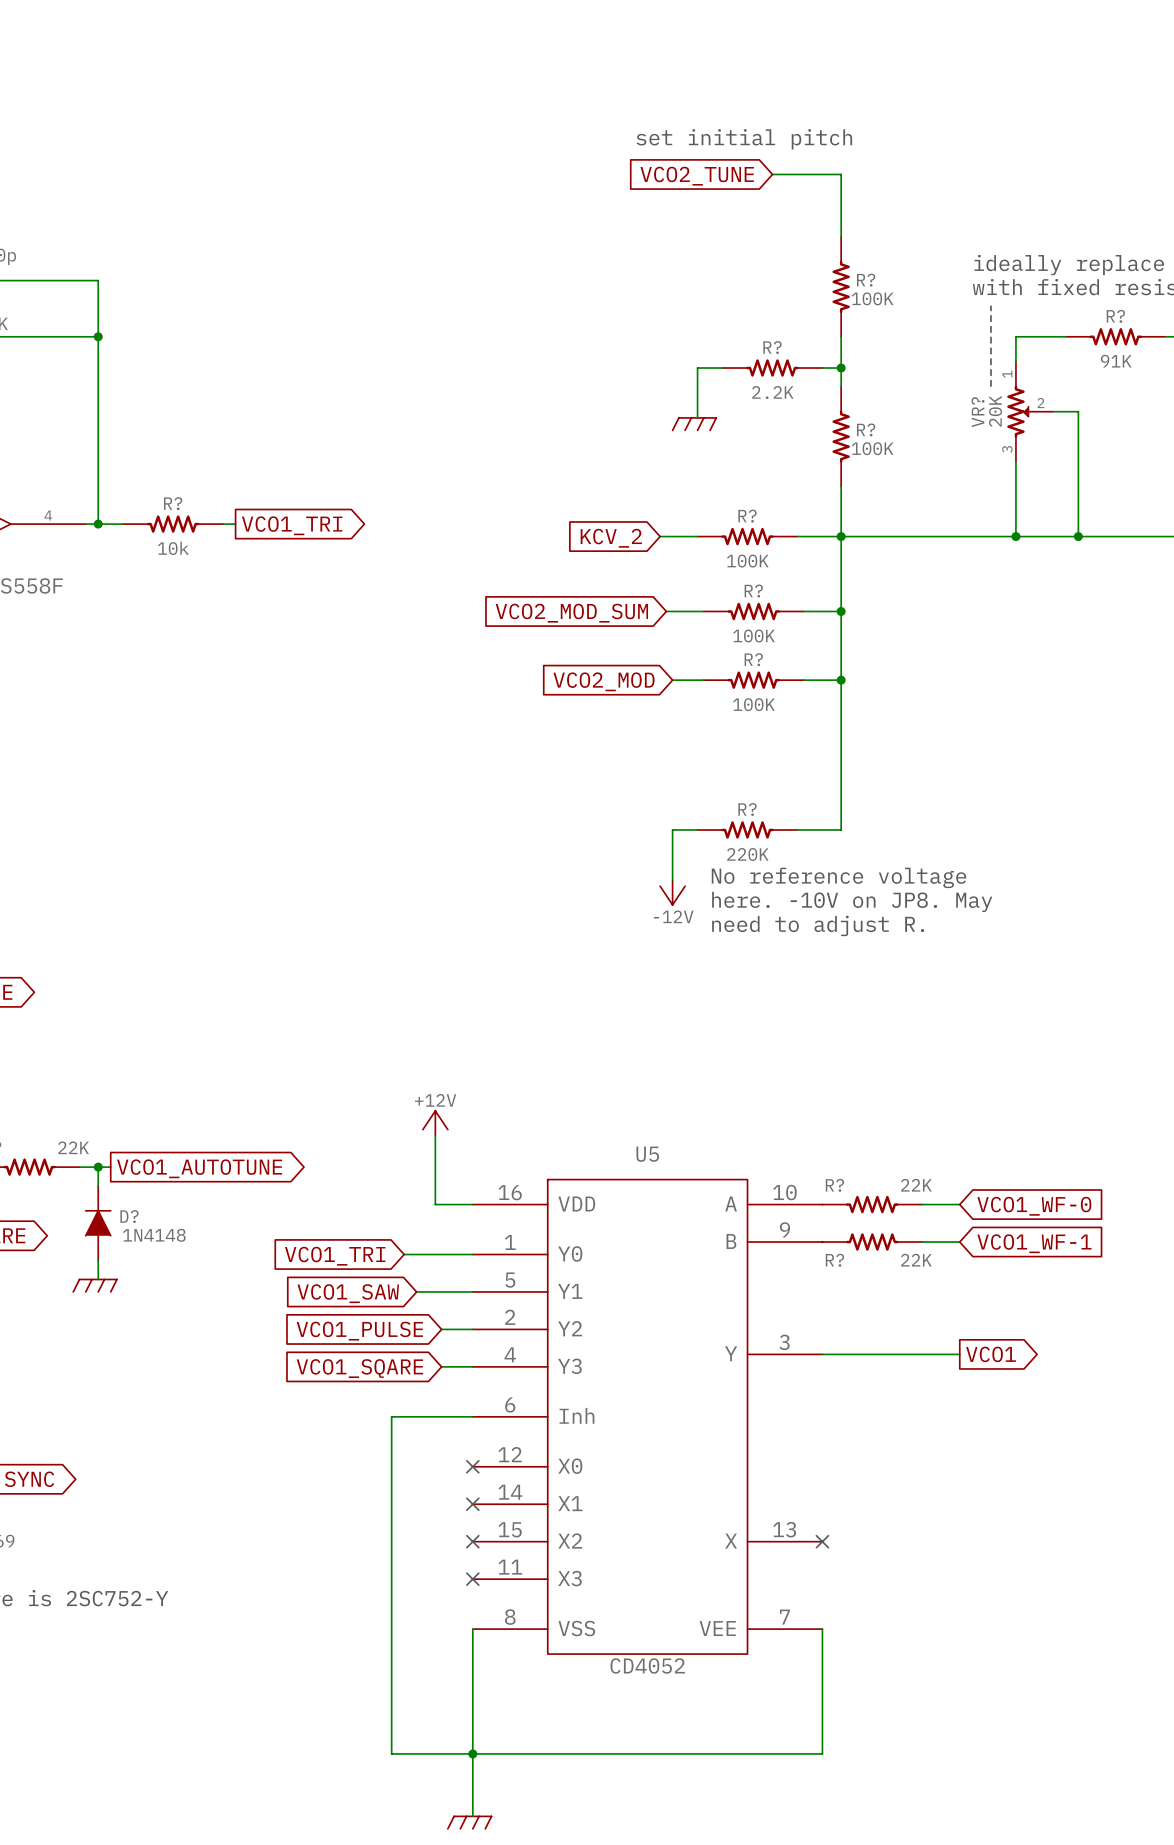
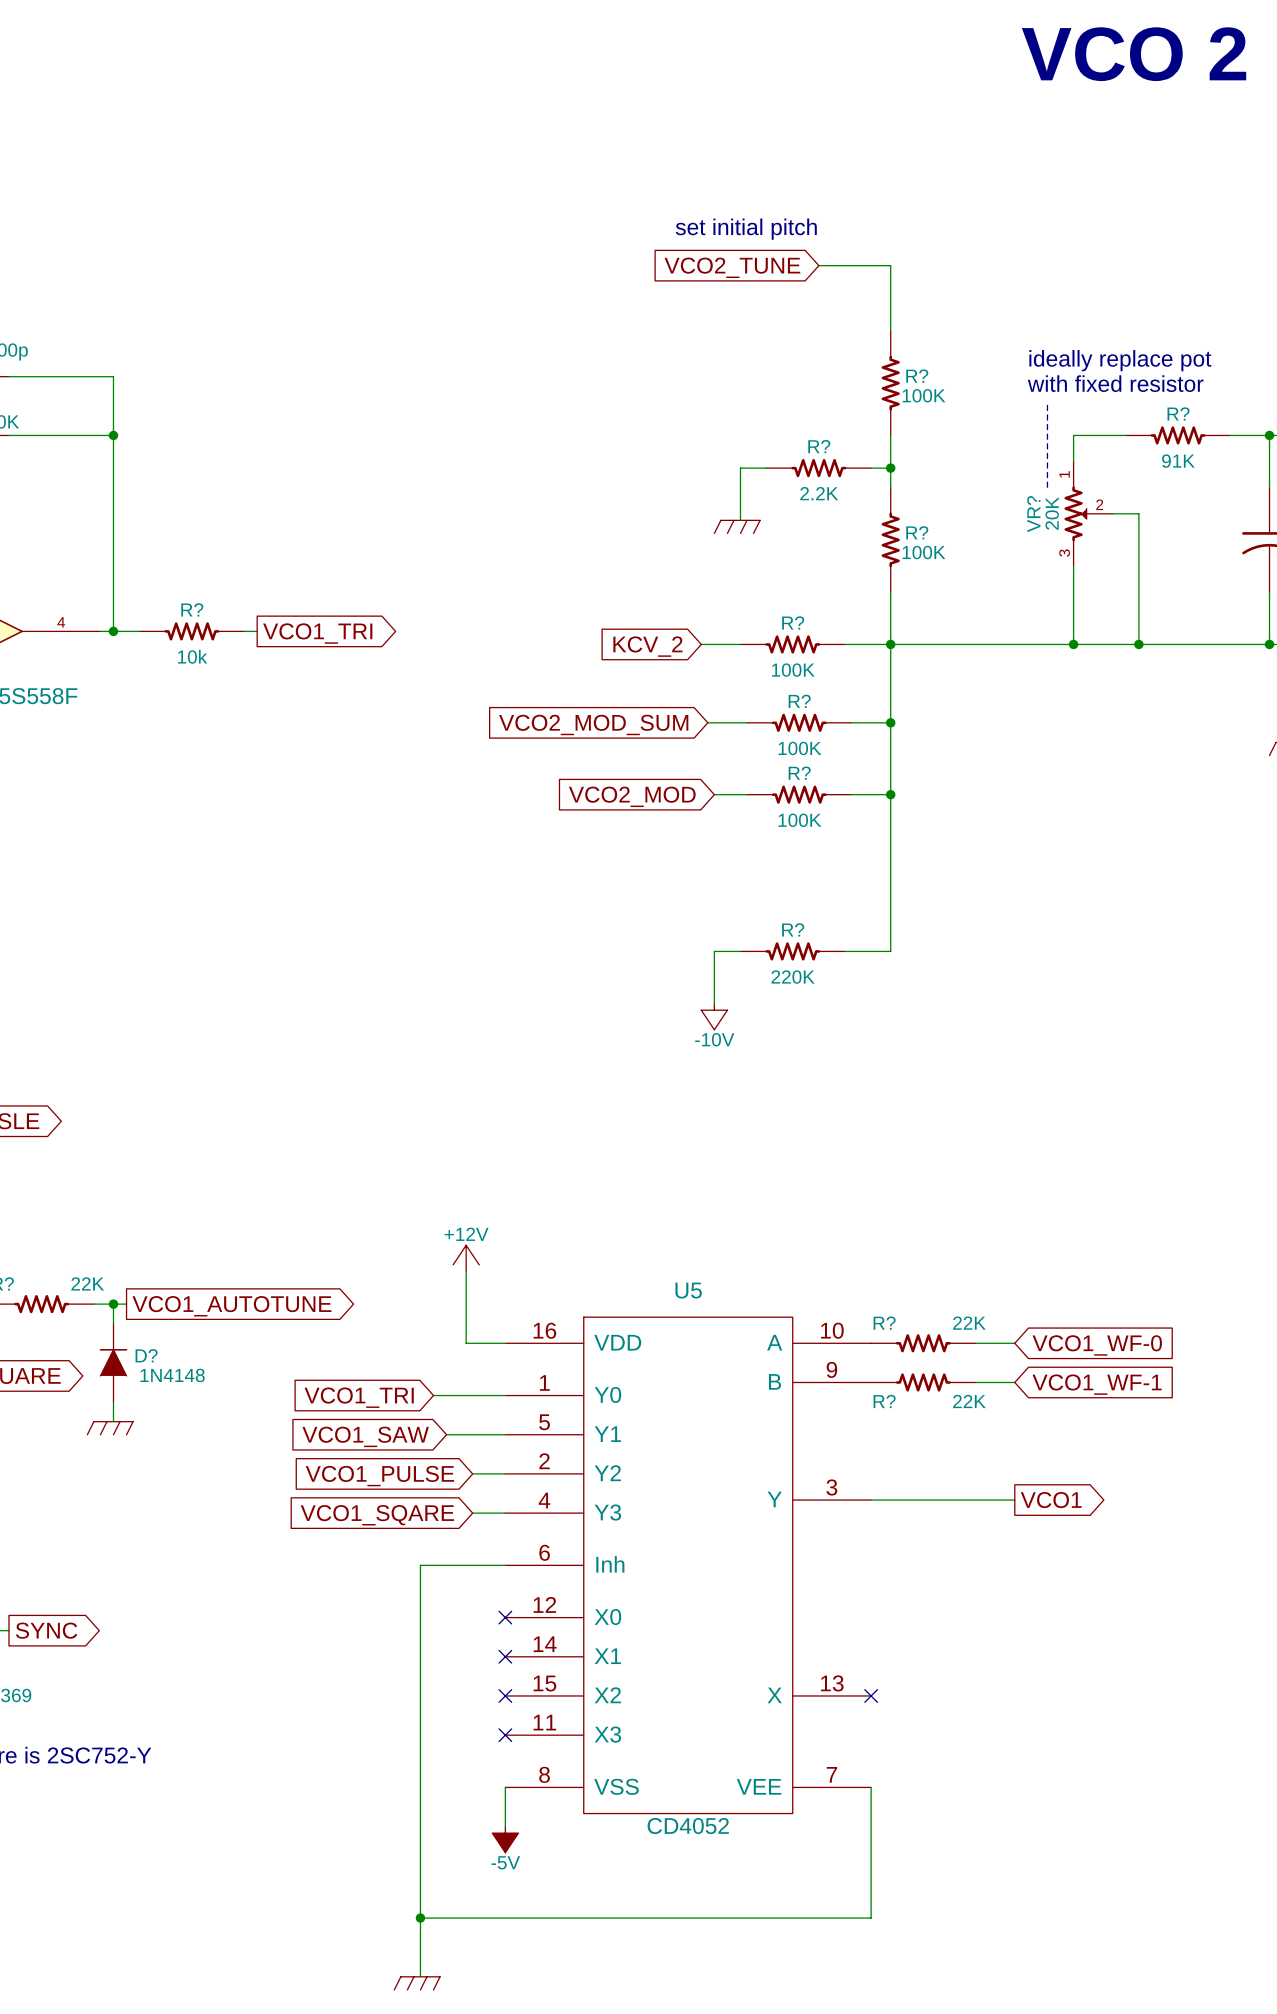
text: No reference voltage (838, 877) -> none
power symbol: -12V (672, 892) -> -10V (714, 1016)
text: here. -10V on JP8. May (852, 901) -> none
text: need to adjust R. (818, 925) -> none
wire: (472, 1666) (472, 1816) -> none
power symbol: none -> -5V (505, 1839)
wire: none -> (420, 1918) (420, 1976)
junction: none -> (420, 1918)
junction: (472, 1753) -> none
power symbol position: (469, 1822) -> (417, 1983)

